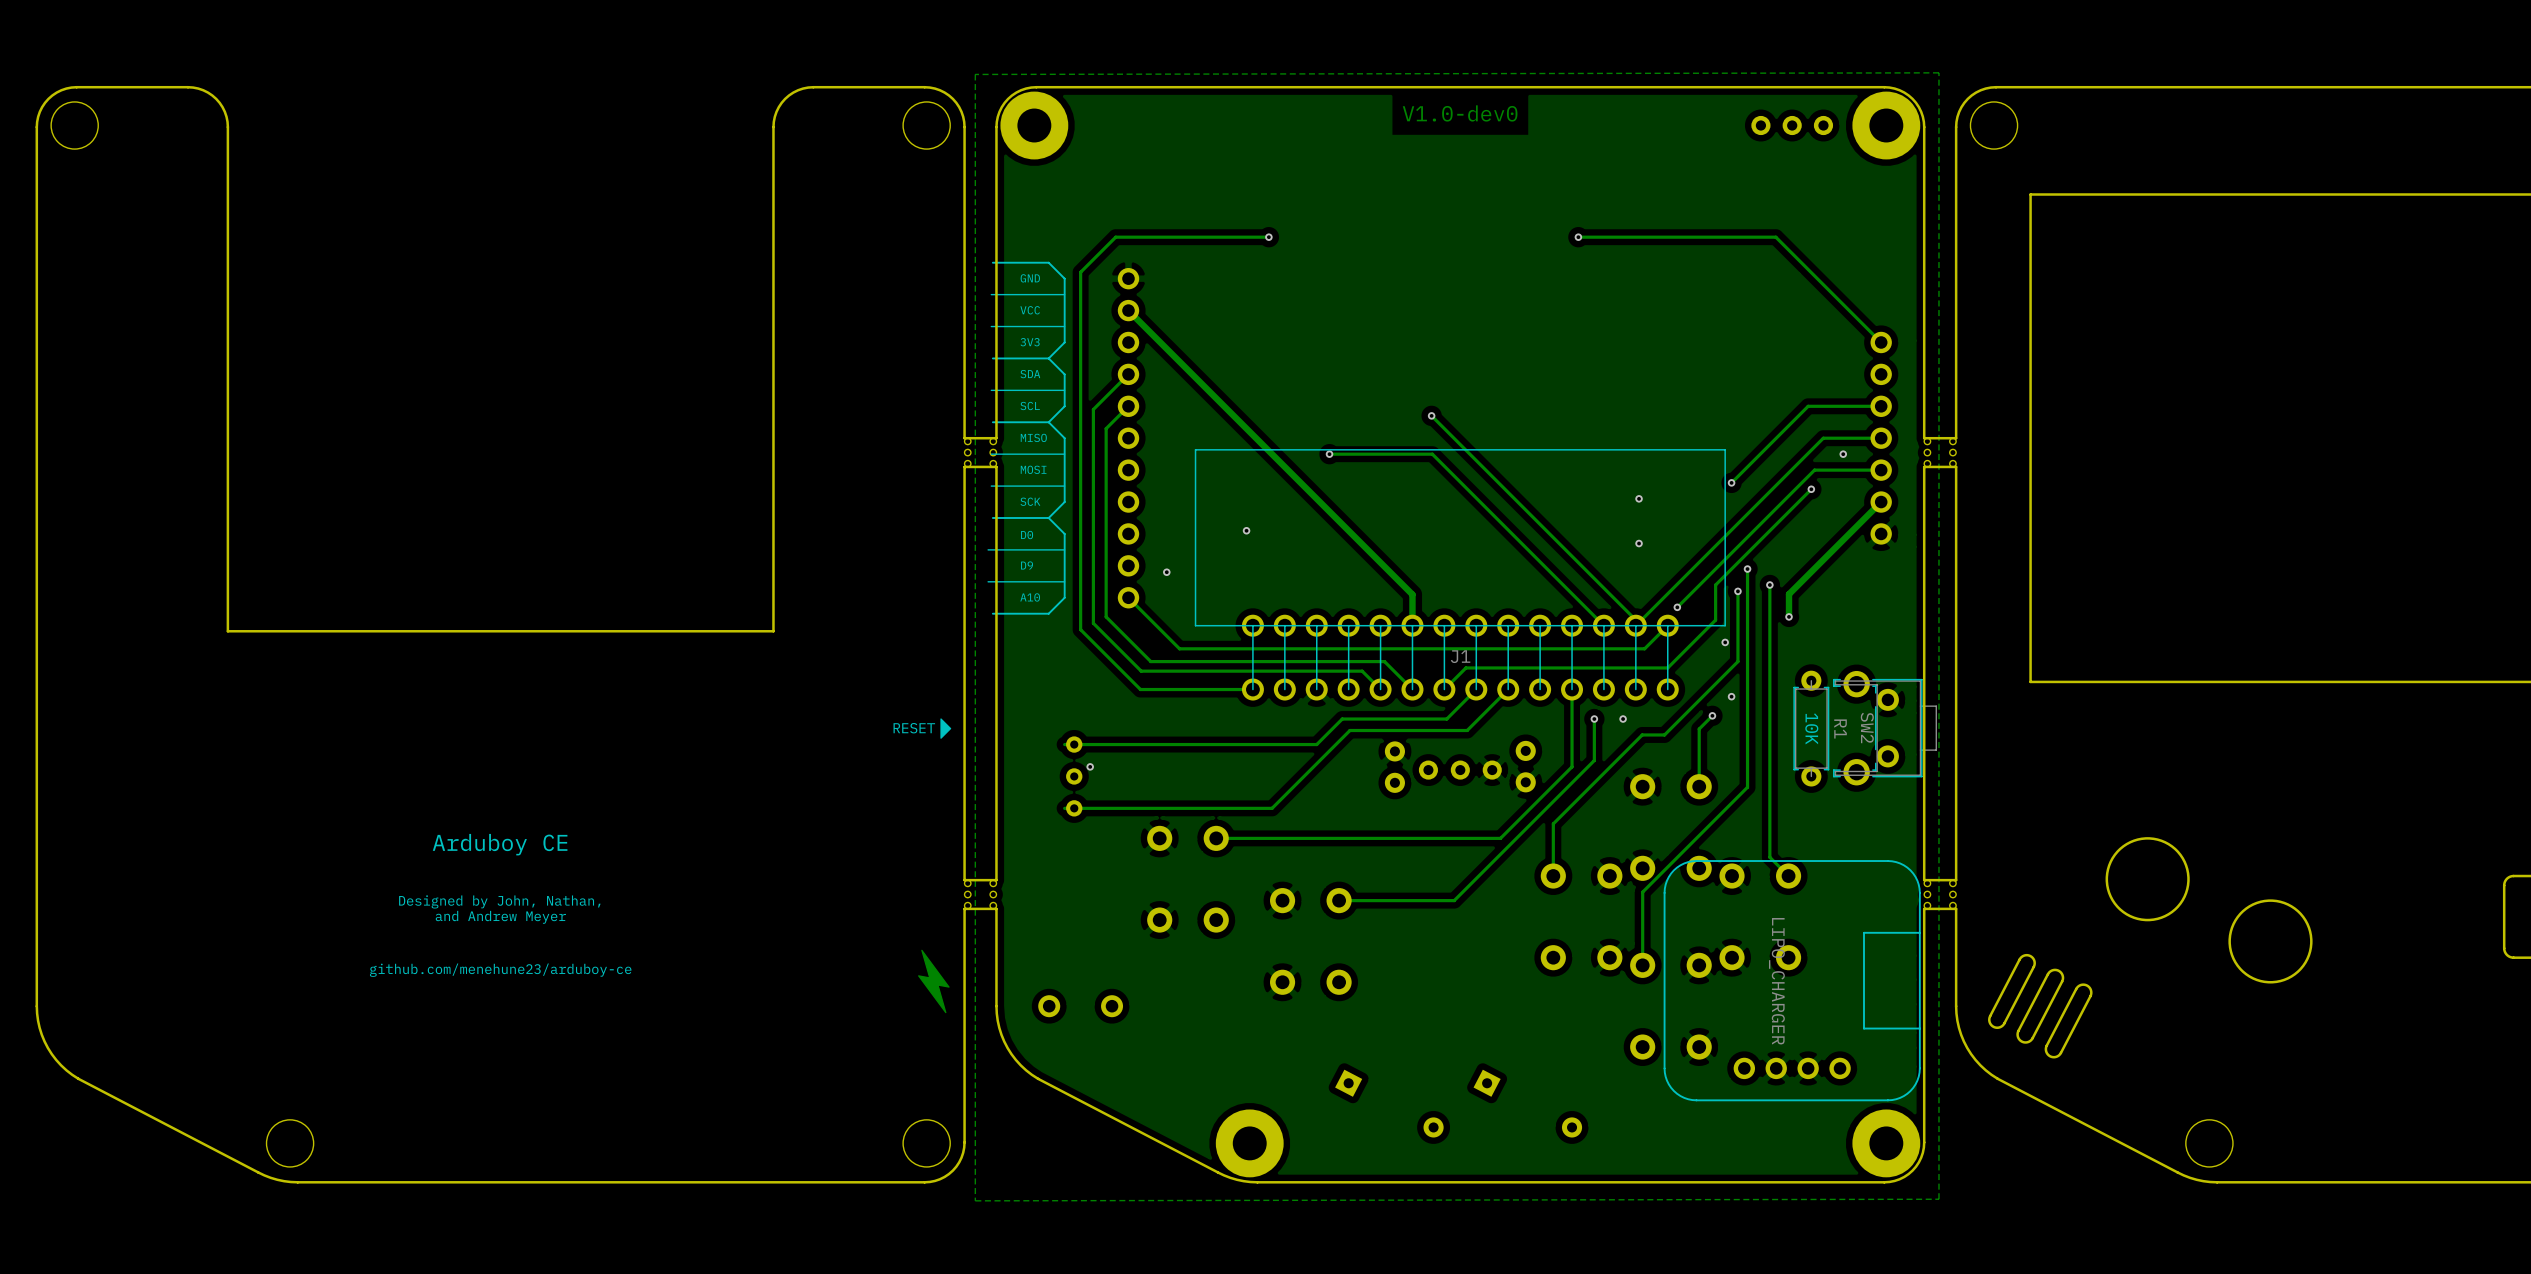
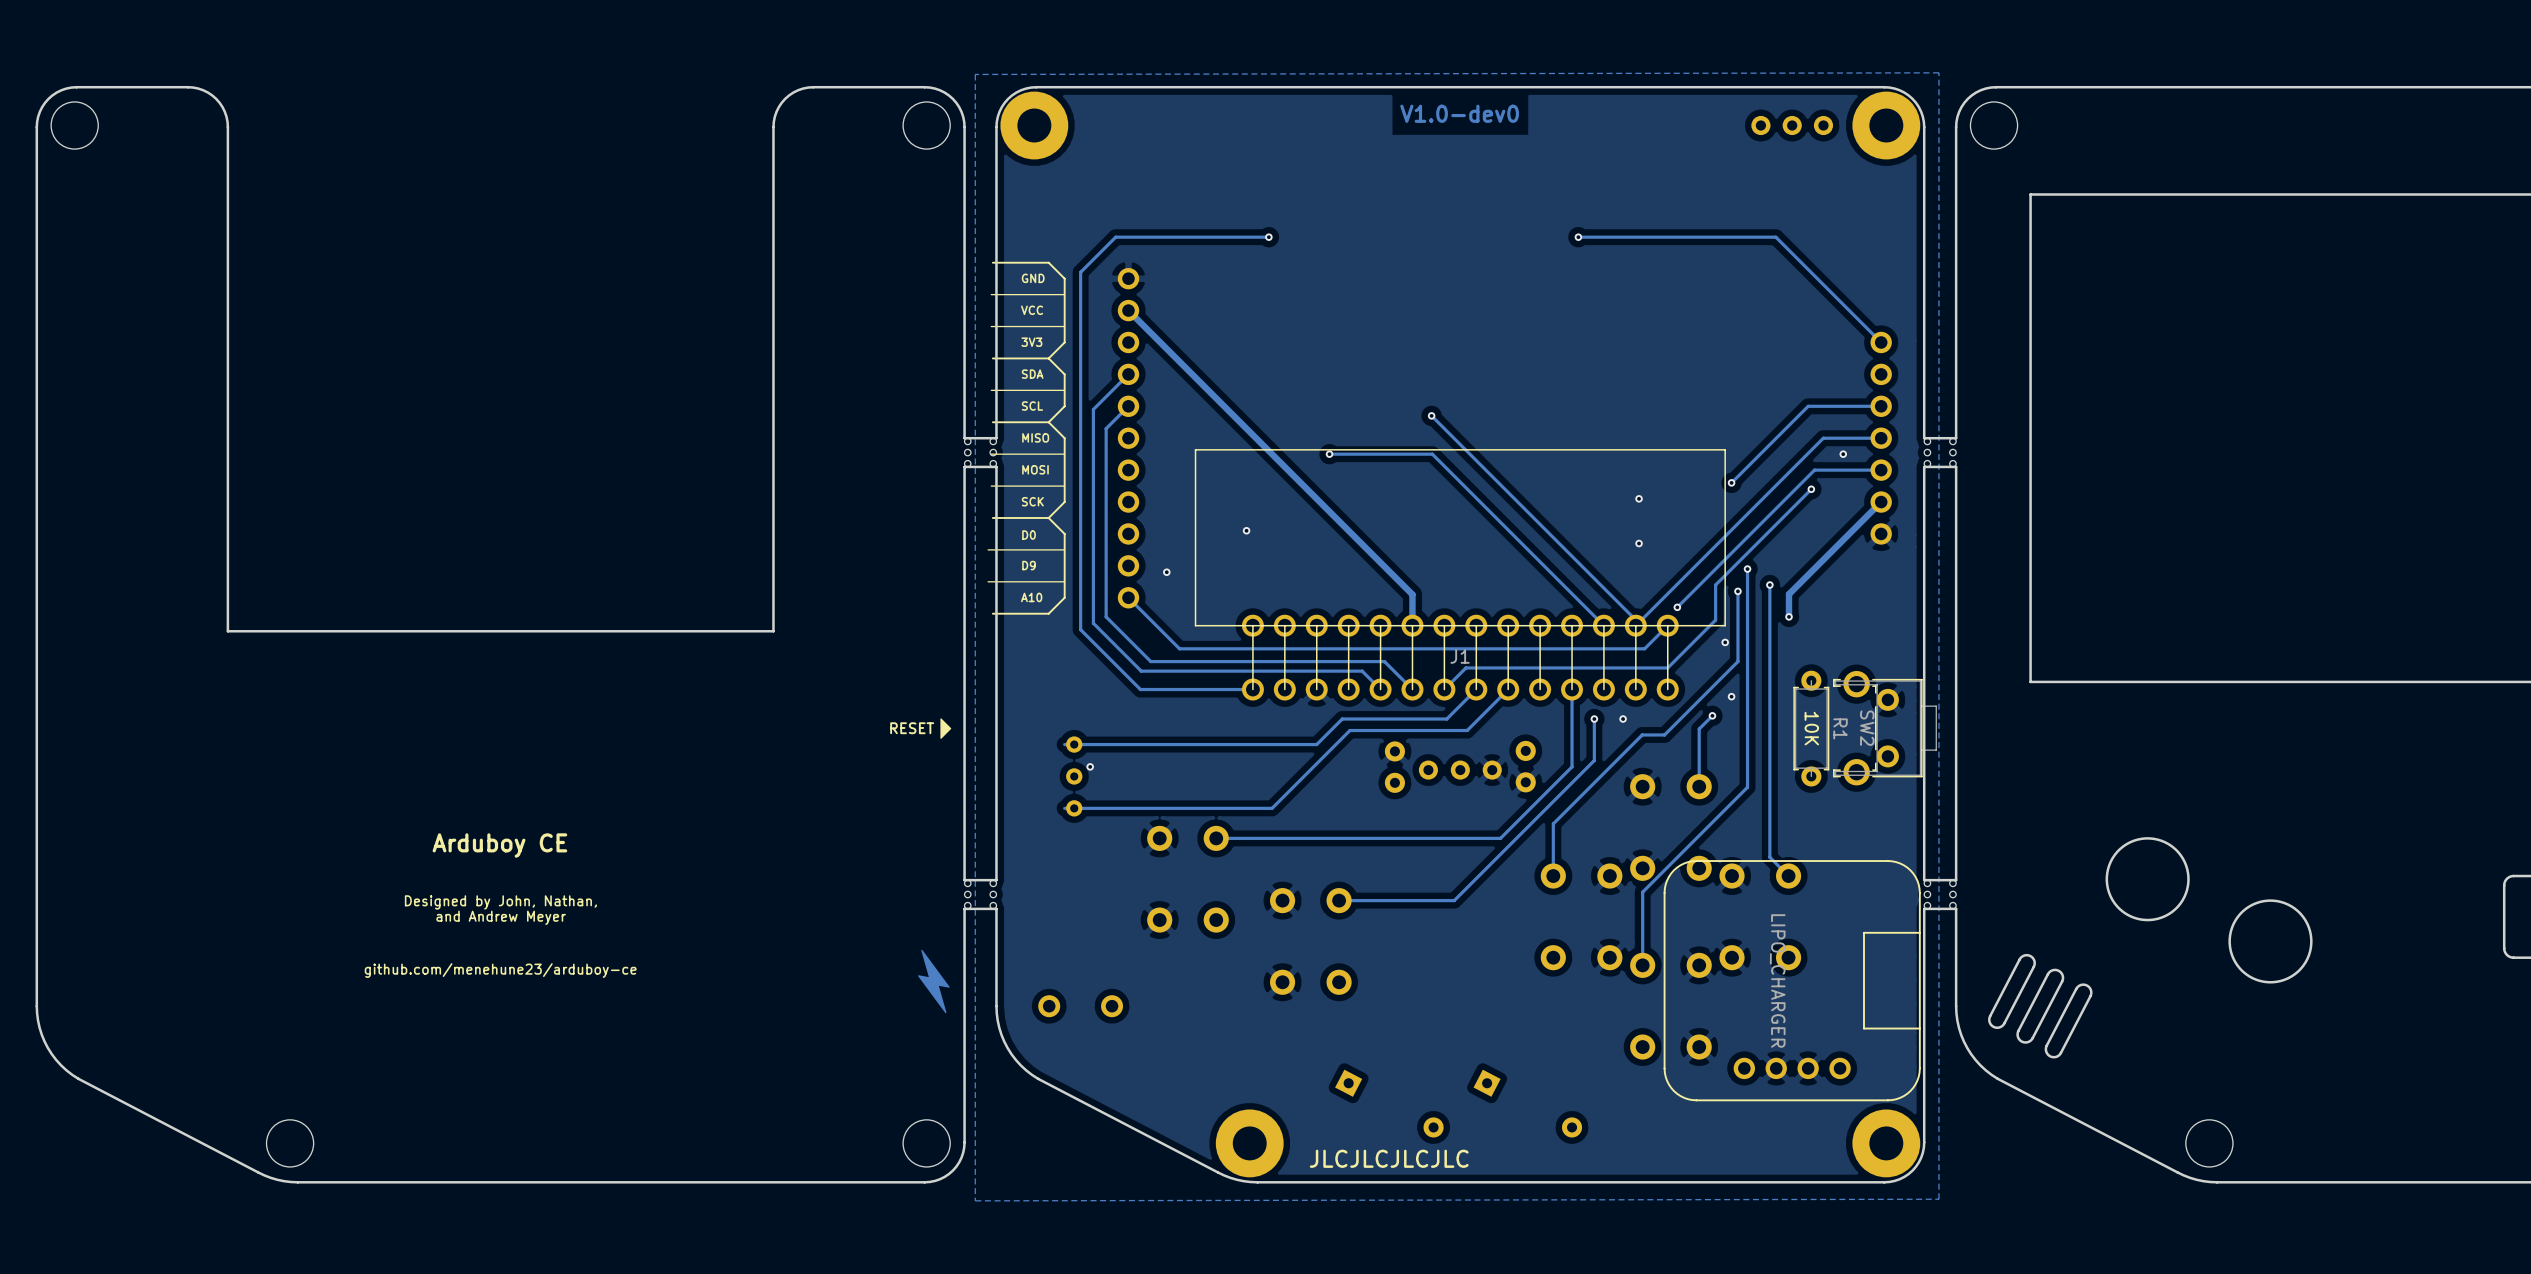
text: none -> JLCJLCJLCJLC (1389, 1158)

